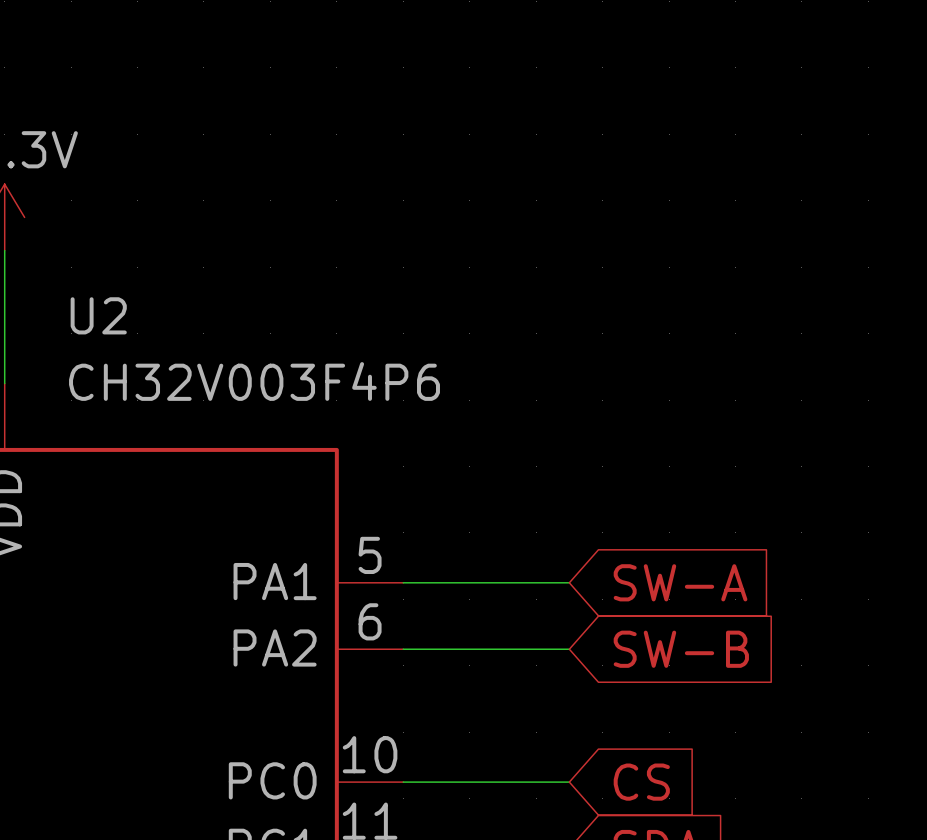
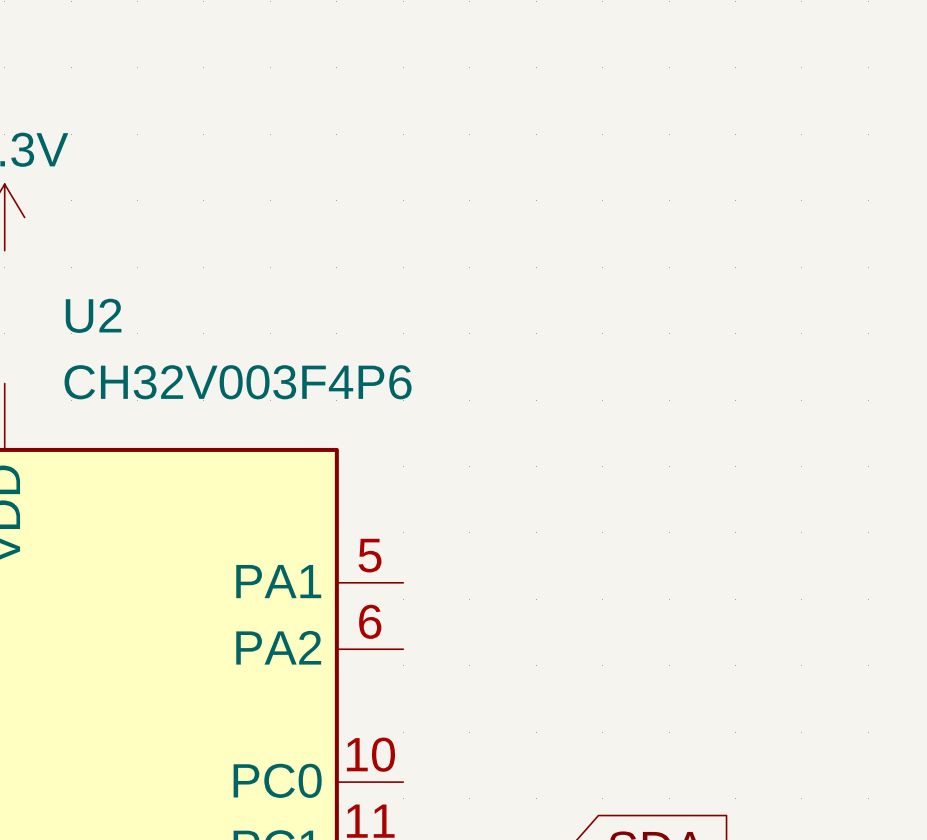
wire: (4, 250) (4, 383) -> none
wire: (403, 582) (569, 582) -> none
global label: SW-A (680, 582) -> none
wire: (403, 649) (569, 649) -> none
global label: SW-B (681, 649) -> none
wire: (403, 782) (569, 782) -> none
global label: CS (641, 782) -> none

